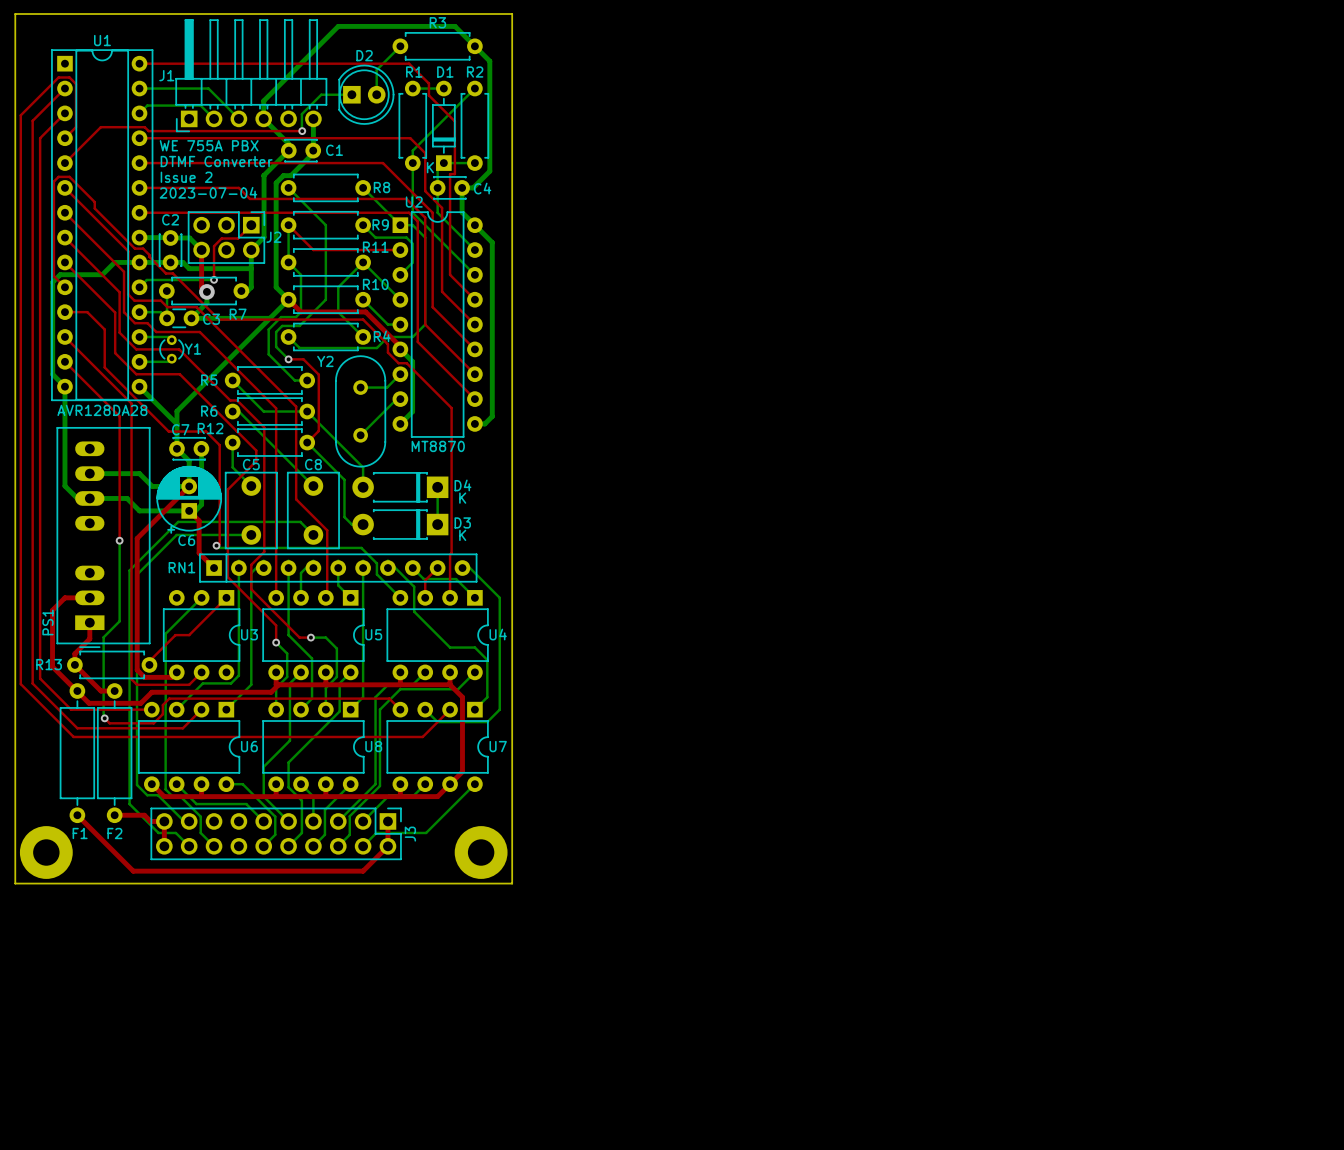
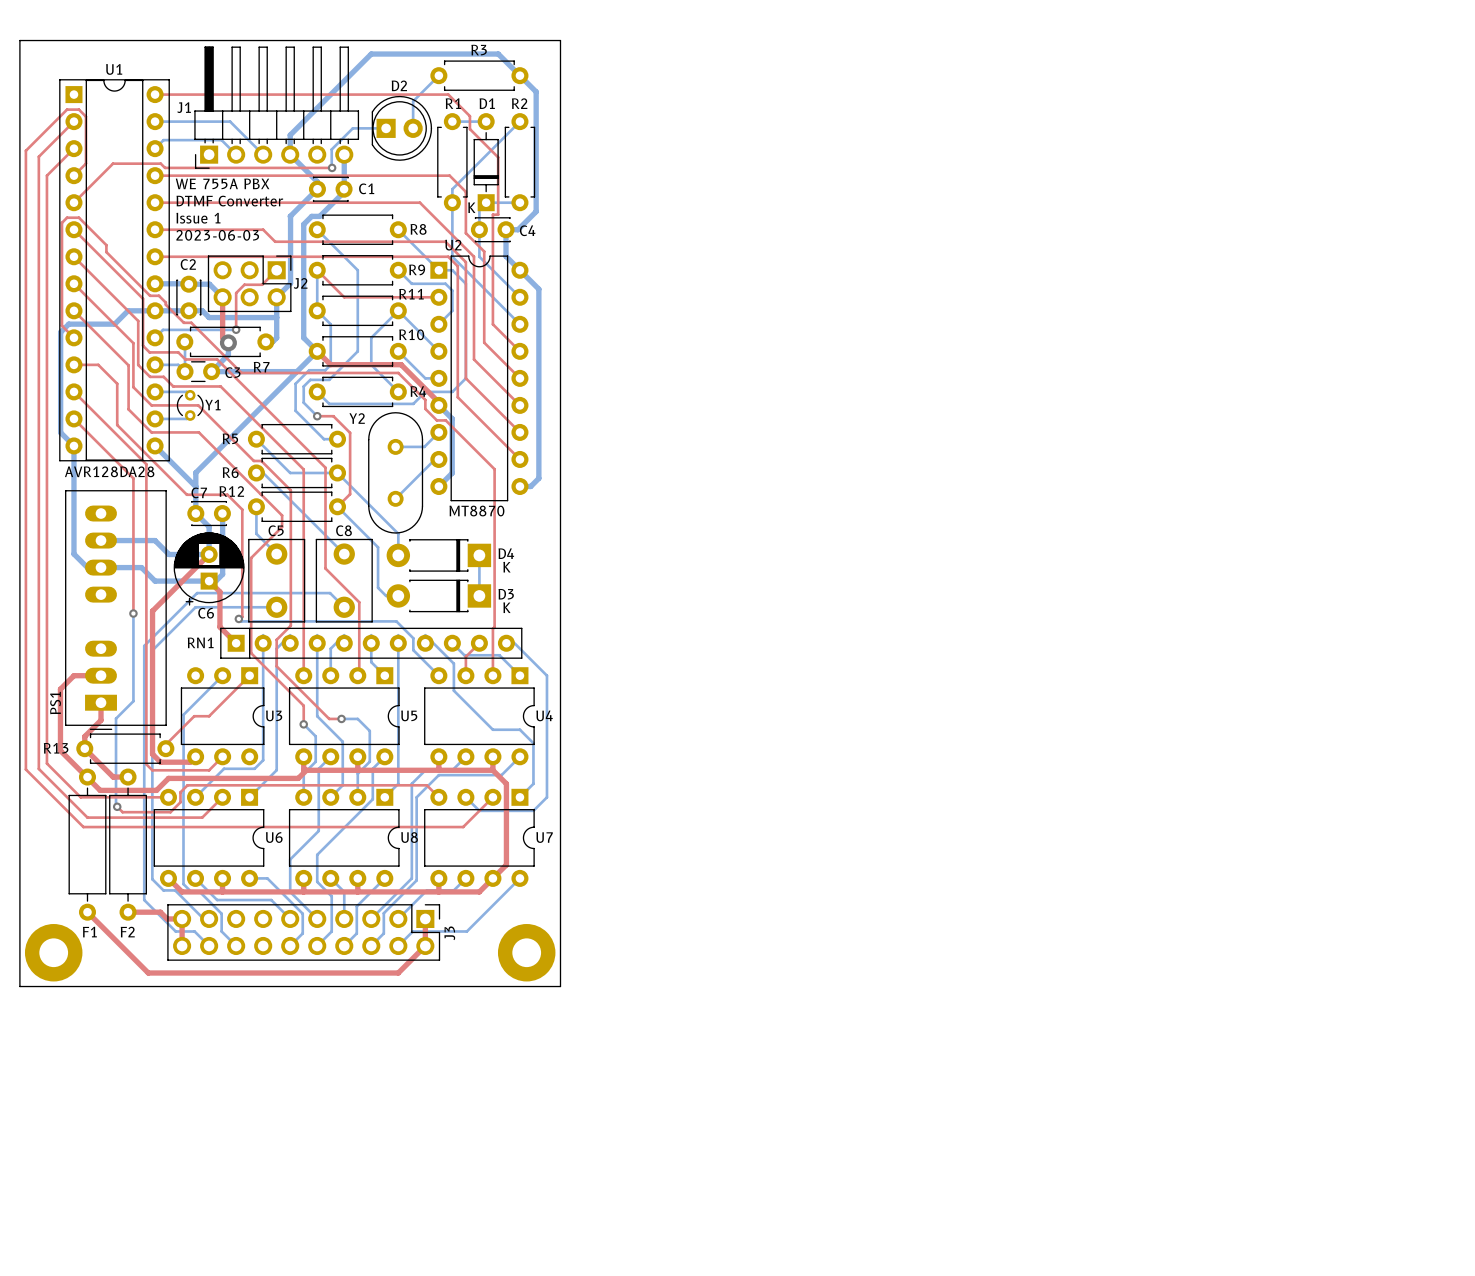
text: Issue 2 (186, 177) -> Issue 1 (198, 218)
text: 2023-07-04 (208, 192) -> 2023-06-03 (217, 235)

